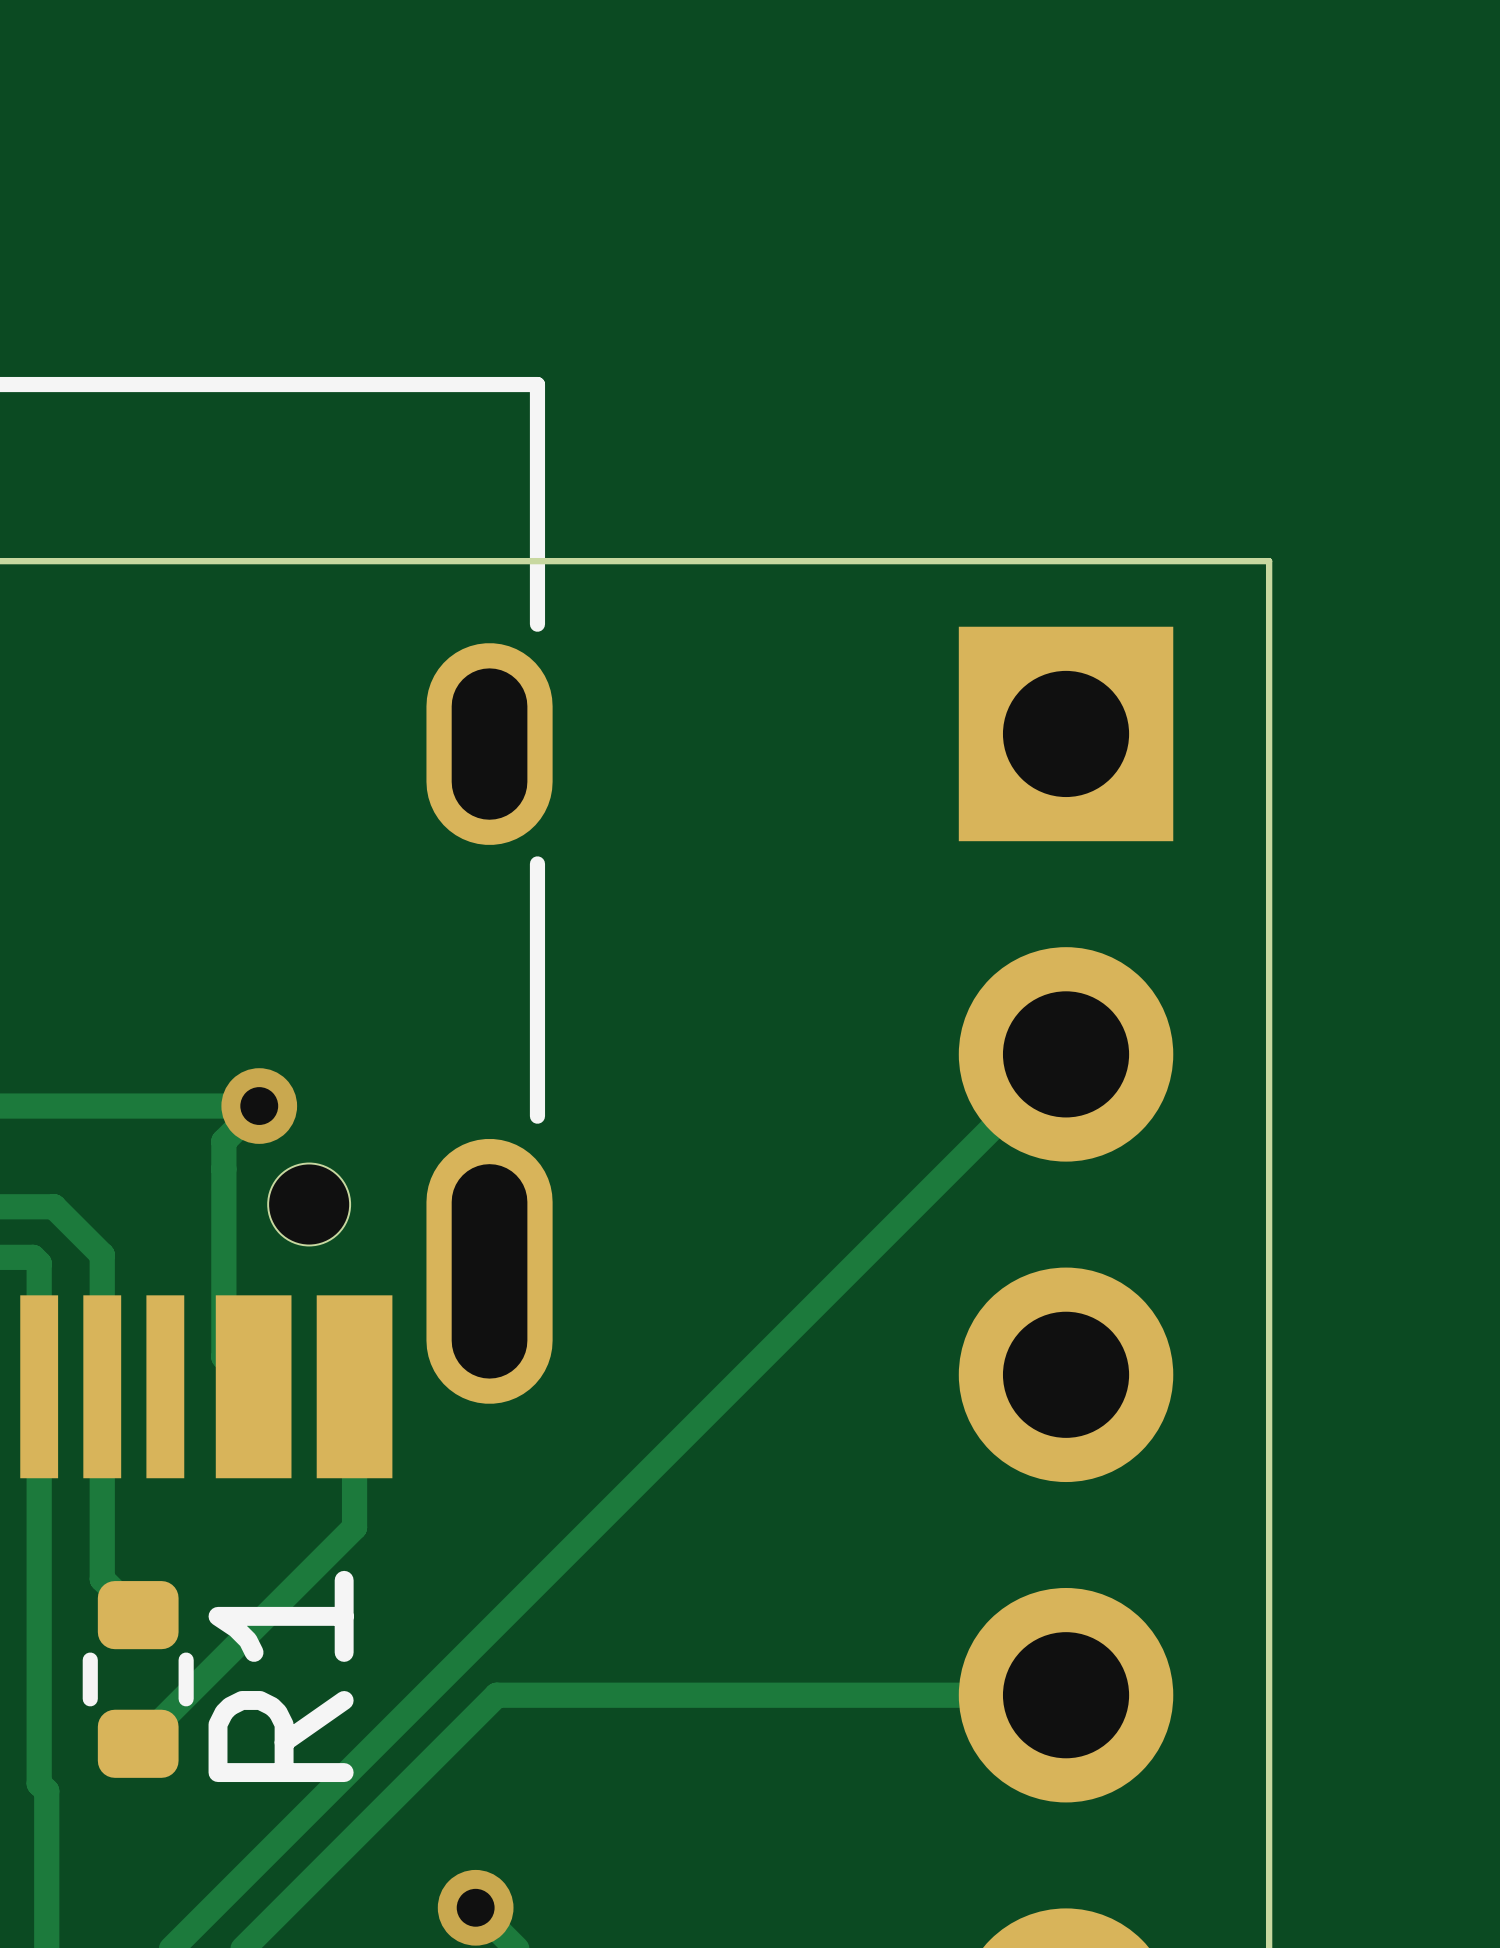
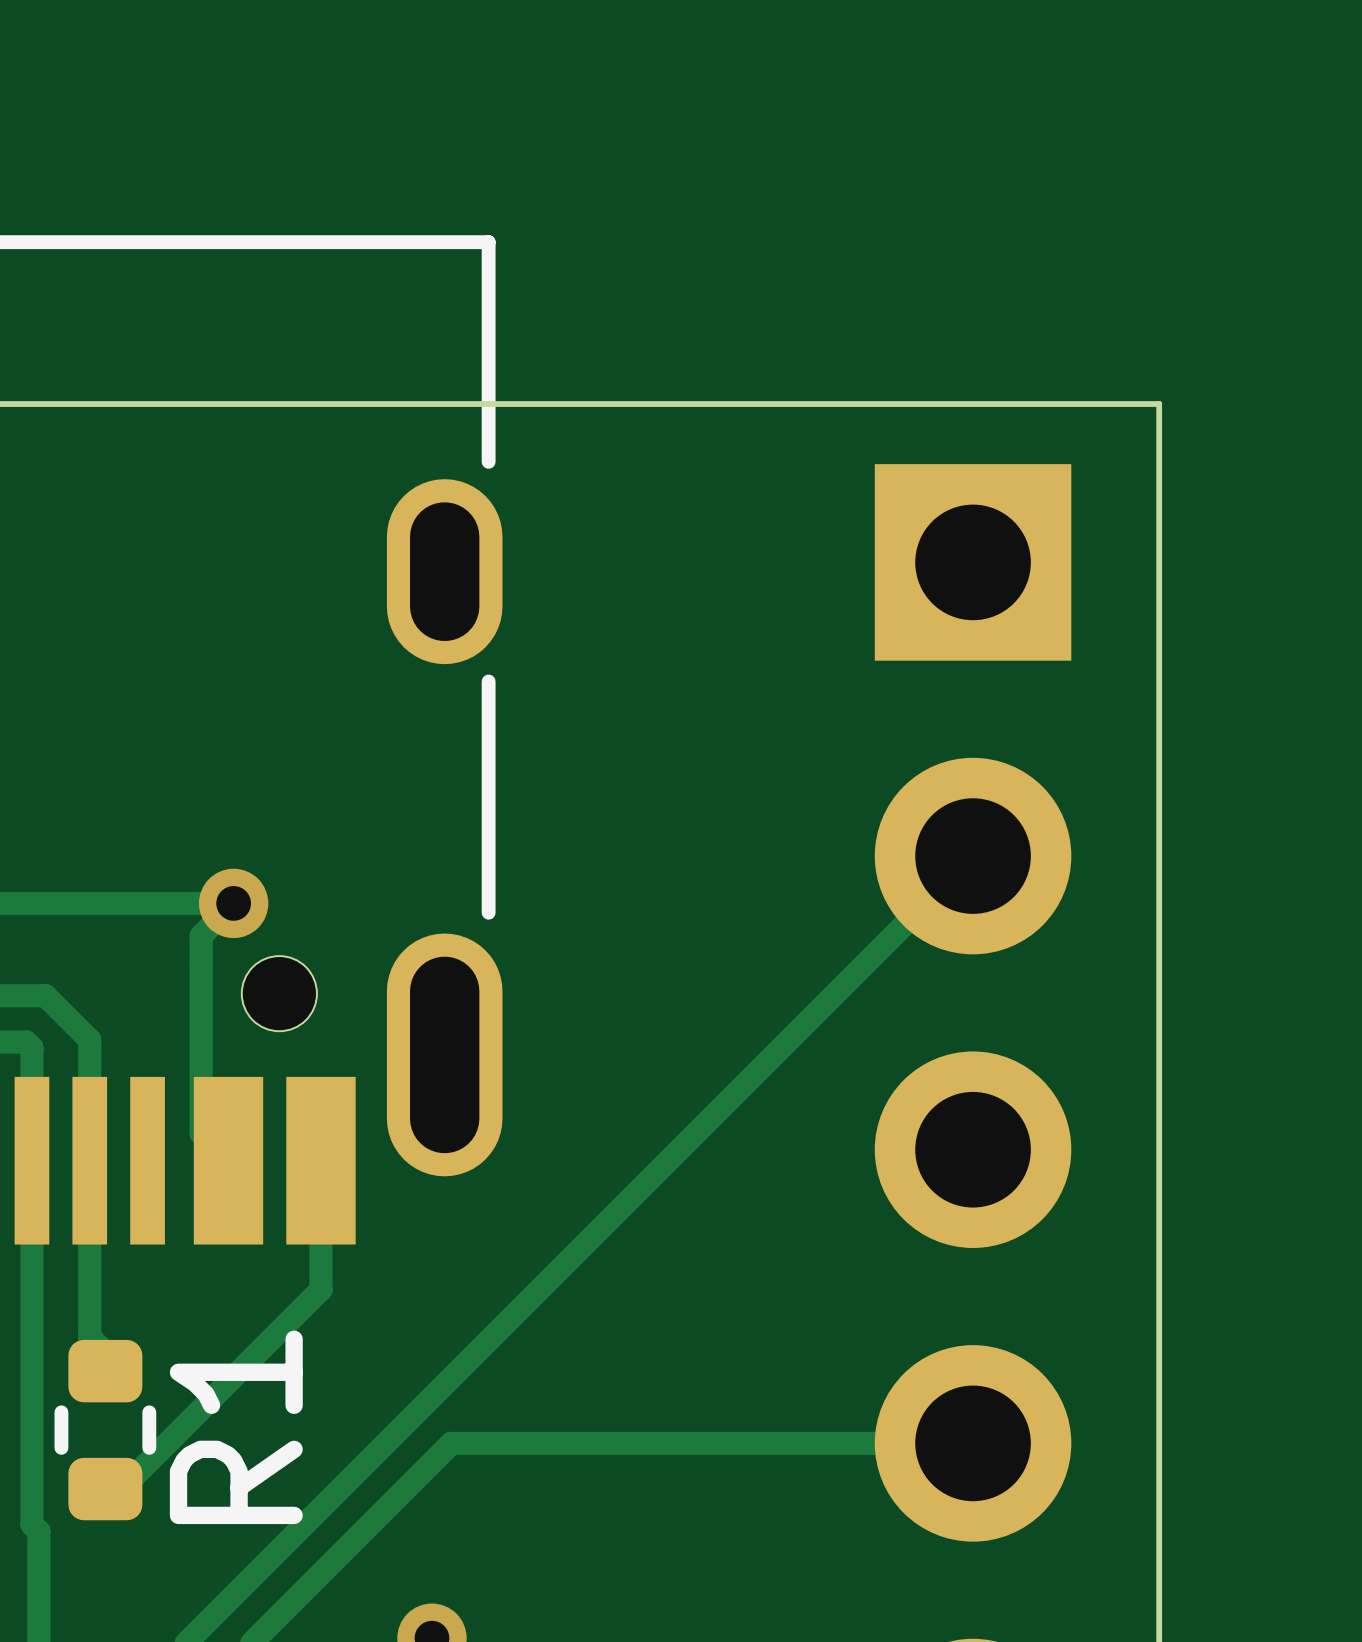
R1 position: (138, 1679) -> (105, 1430)

